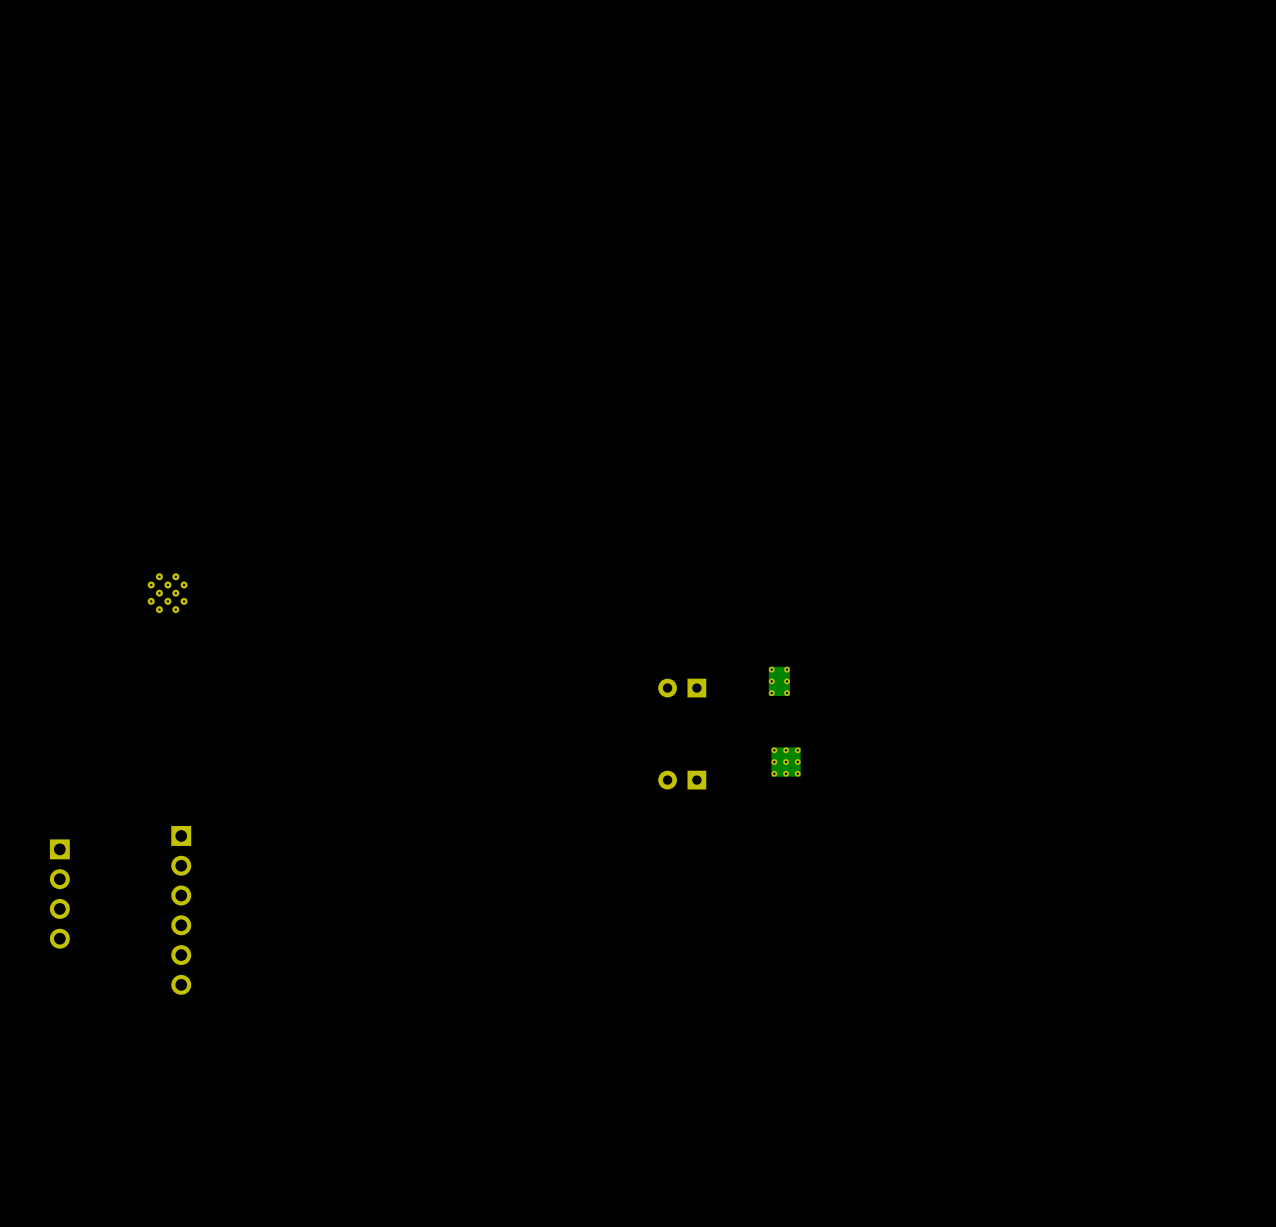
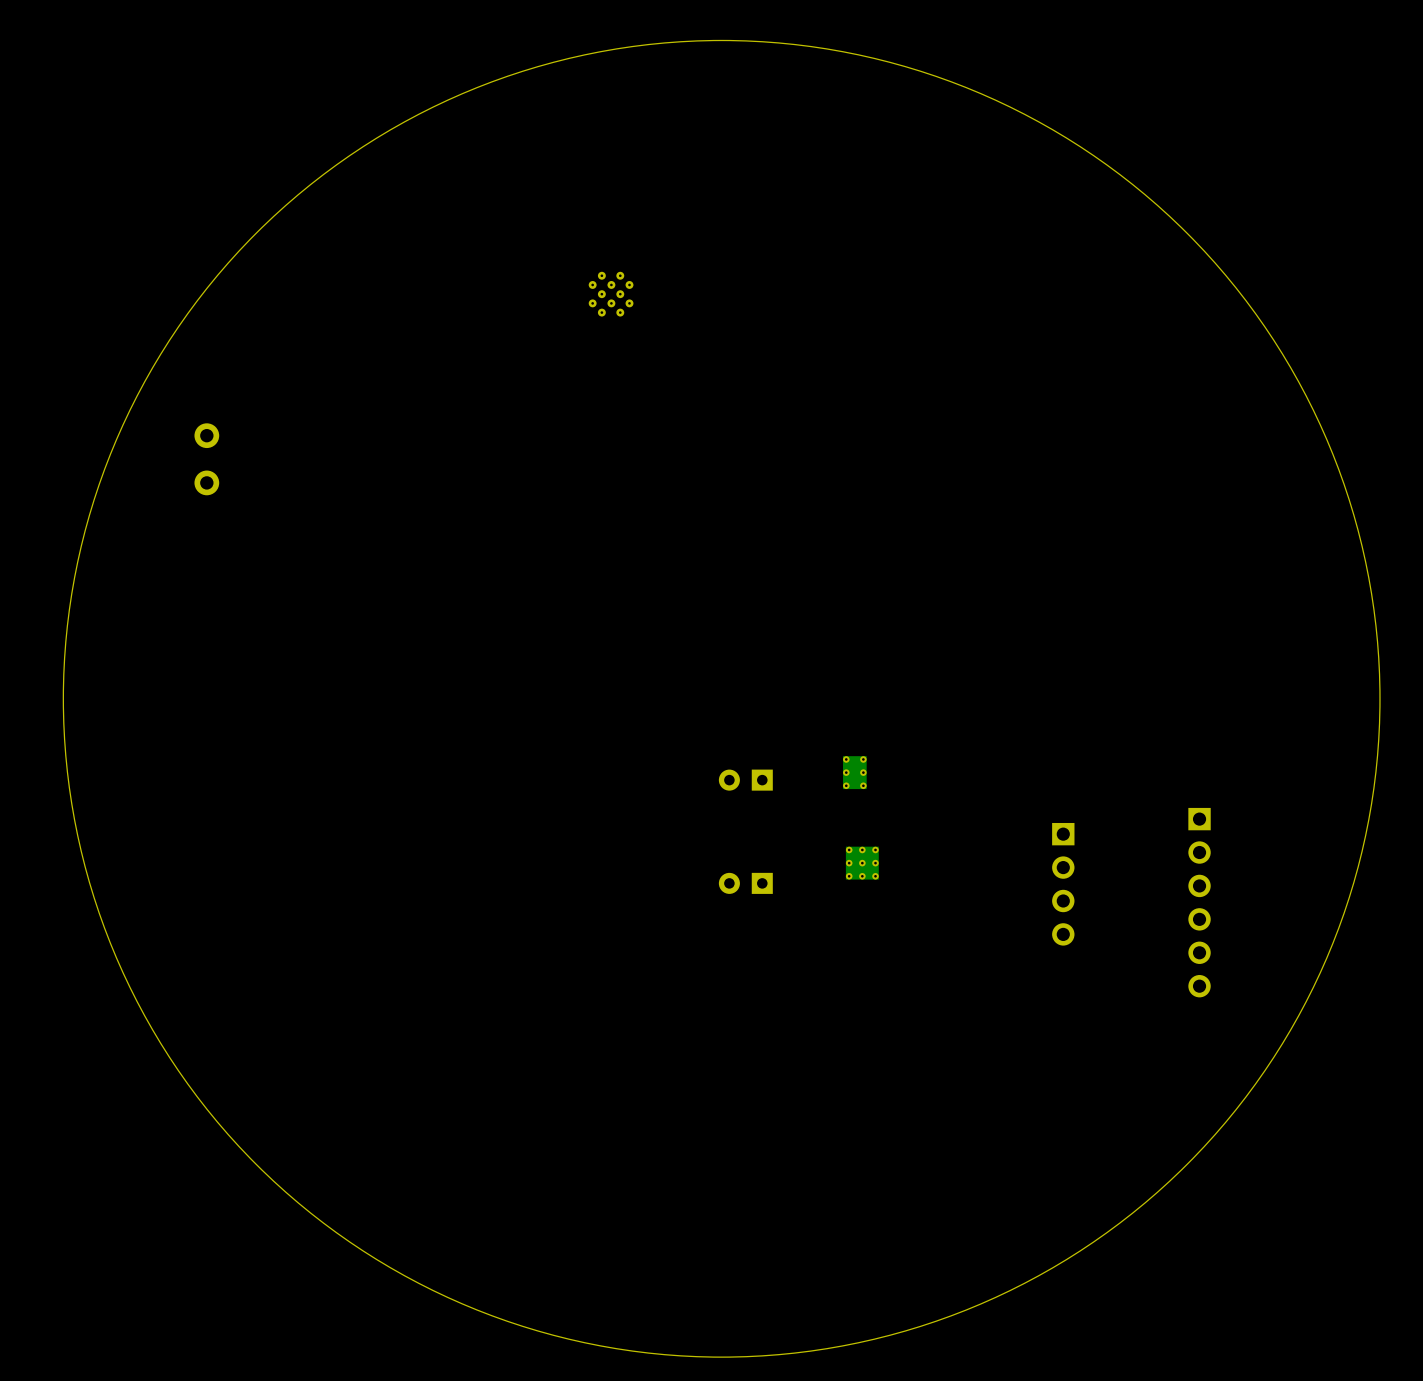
round board edge: none -> [63, 40, 1381, 1358]
part: none -> (611, 294)
part: none -> (206, 435)
part: none -> (206, 482)
part: (167, 593) -> none
part: none -> (1063, 884)
part: none -> (1199, 902)
part: (59, 894) -> none
part: (181, 910) -> none

